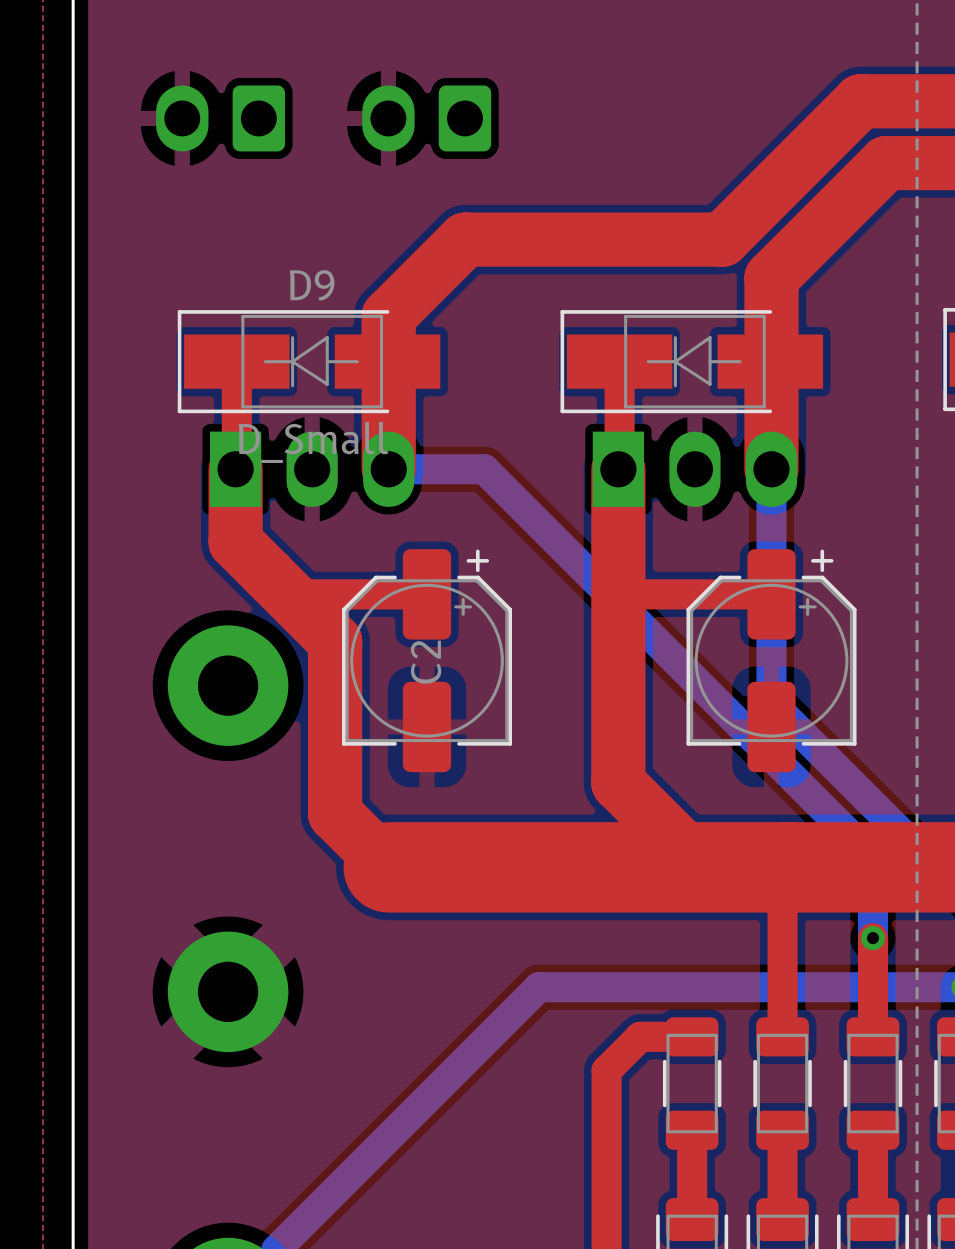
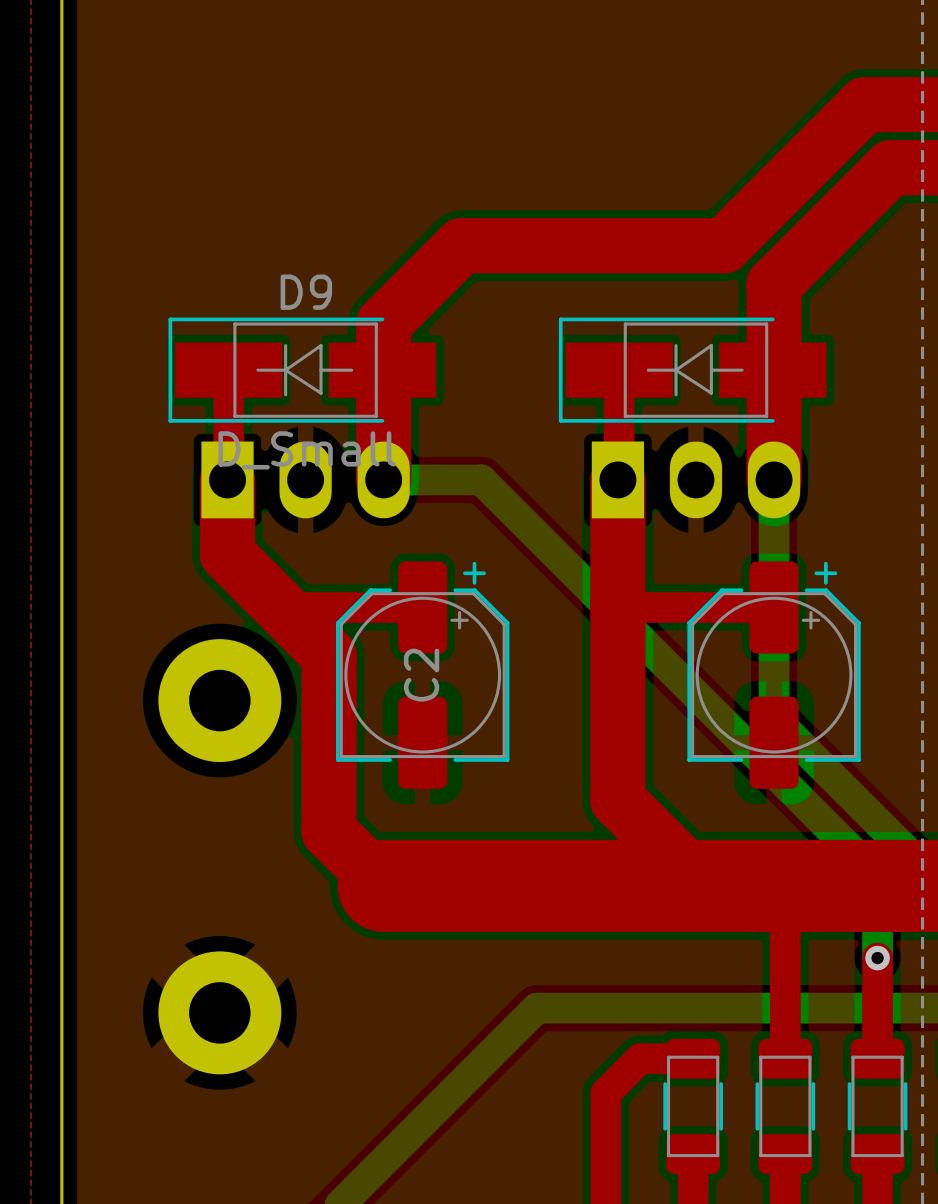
part: (220, 118) -> none
part: (426, 118) -> none

